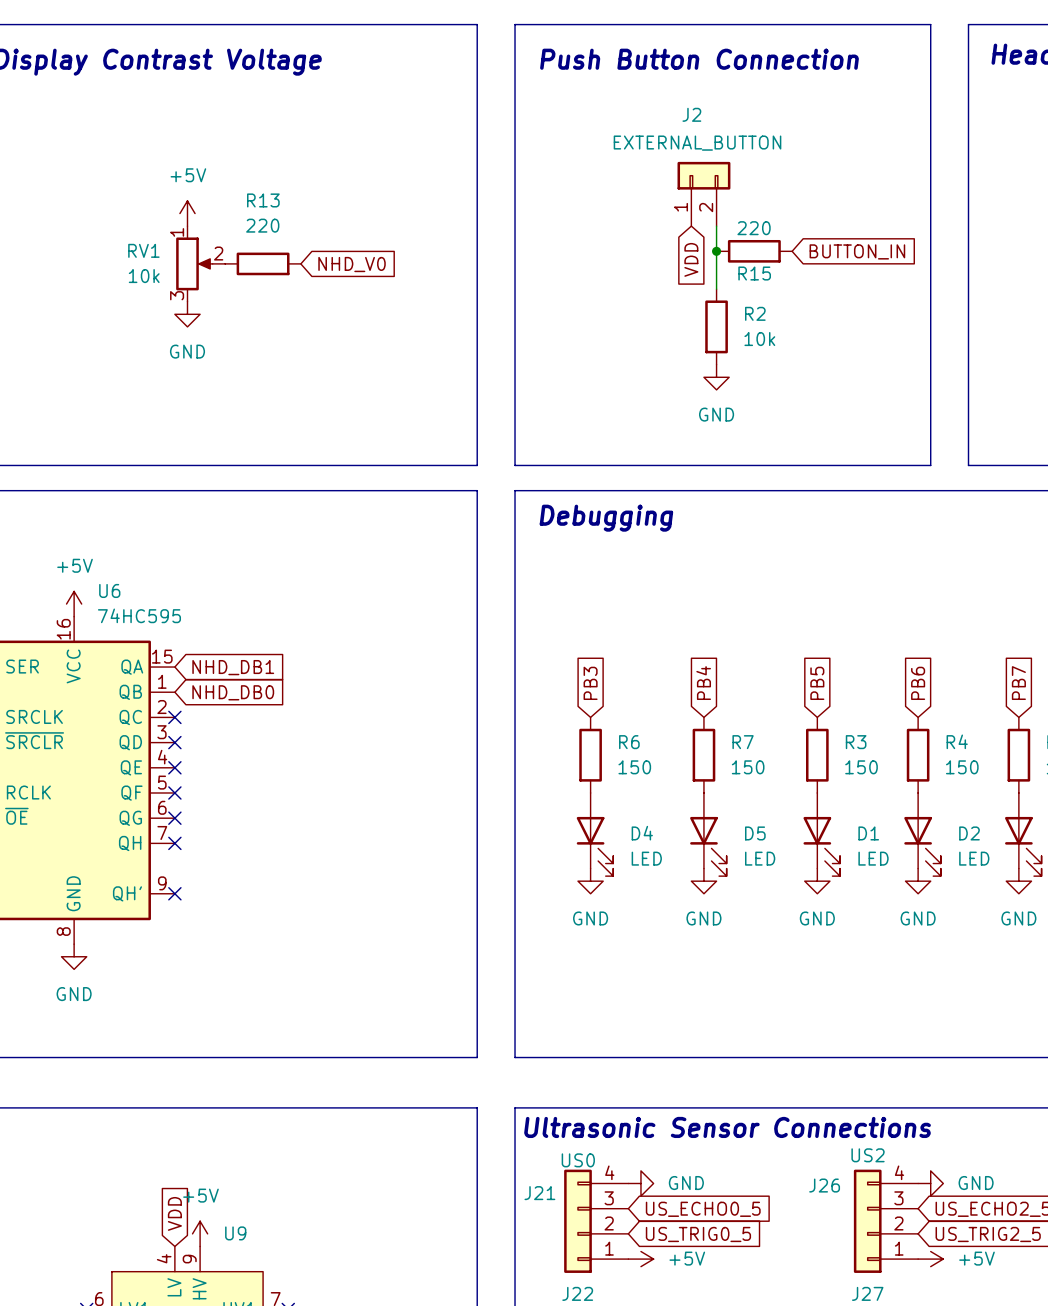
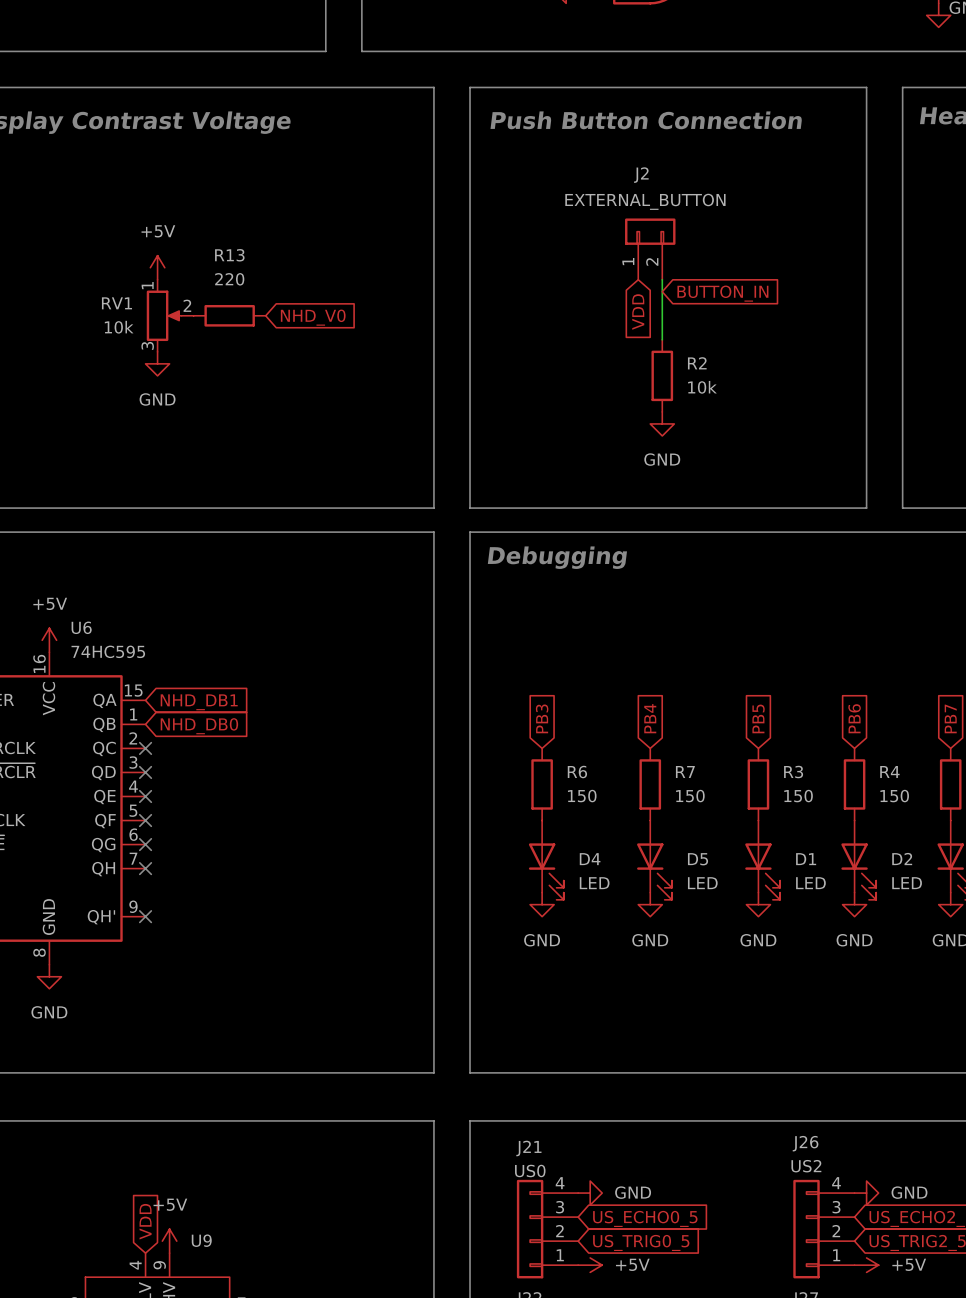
junction: (716, 251) -> none
R15: 220 (754, 251) -> none
global label position: BUTTON_IN (857, 251) -> BUTTON_IN (722, 293)
text: Ultrasonic Sensor Connections (727, 1127) -> none
J26 name position: J26 (824, 1185) -> J26 (805, 1143)
J21 name position: J21 (539, 1193) -> J21 (528, 1148)

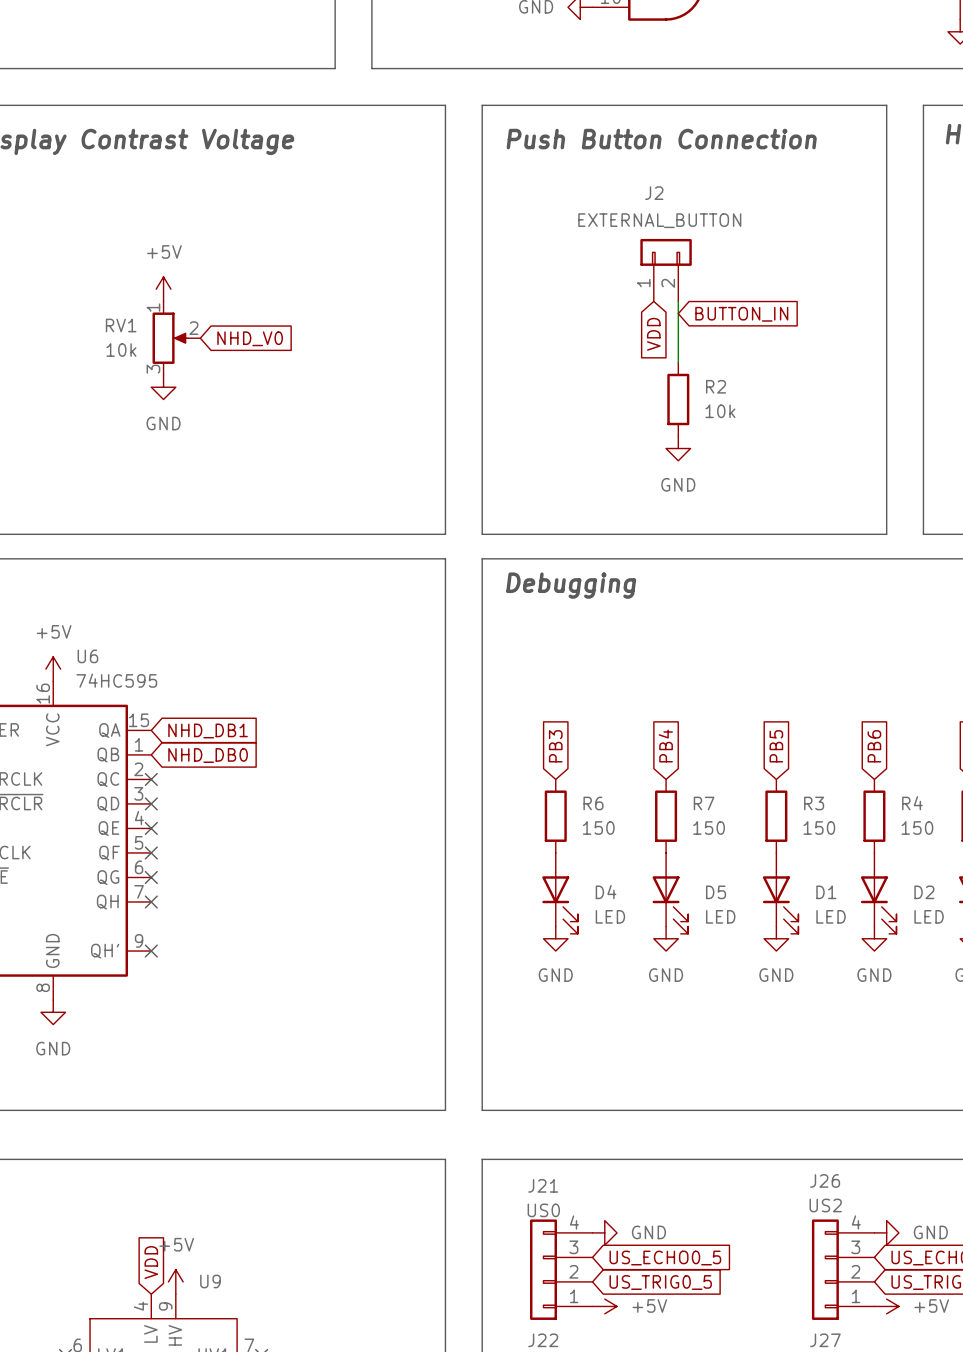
R13: 220 (229, 315) -> none
global label position: NHD_V0 (313, 317) -> NHD_V0 (250, 338)

